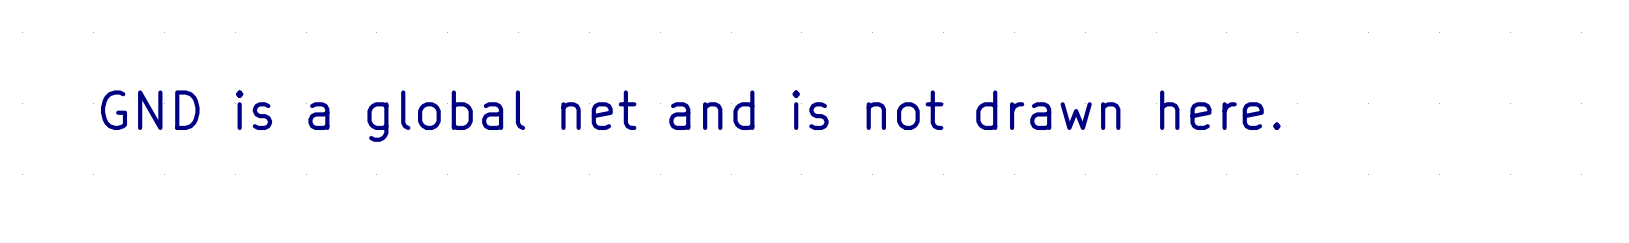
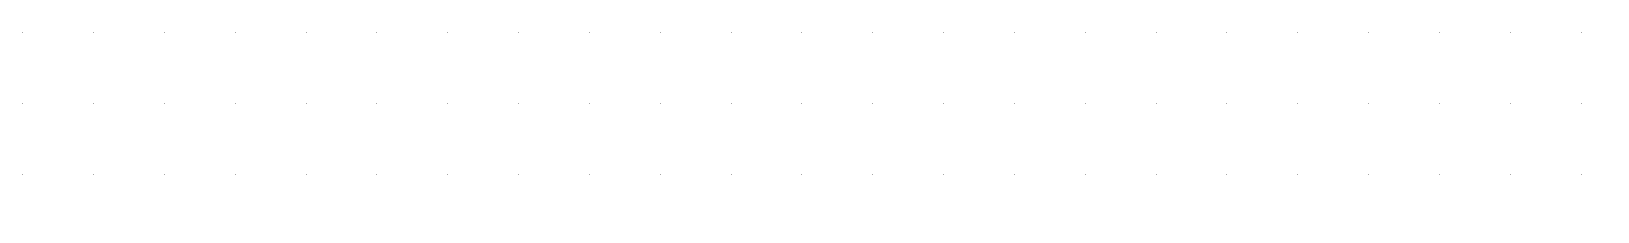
text: GND is a global net and is not drawn here. (690, 116) -> none

